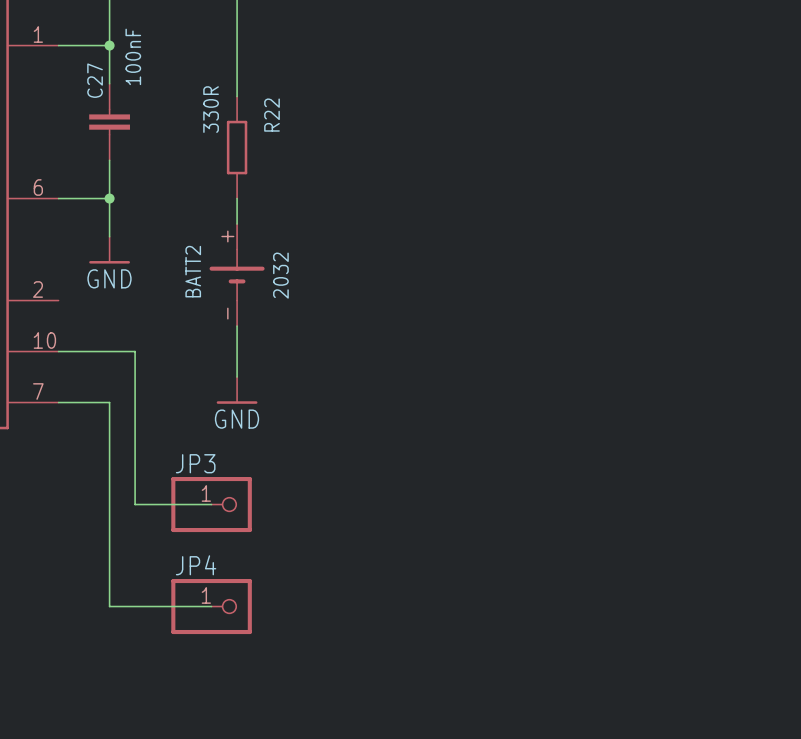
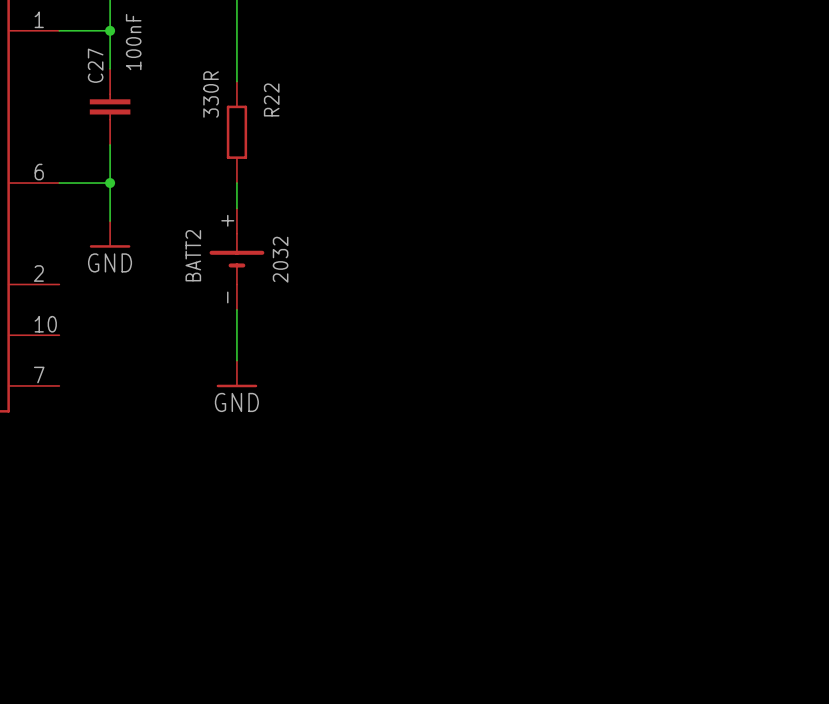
wire: (58, 351) (135, 351) (135, 504) (211, 504) -> none
wire: (58, 402) (109, 402) (109, 606) (211, 606) -> none
JP3: (211, 504) -> none
JP4: (211, 606) -> none

